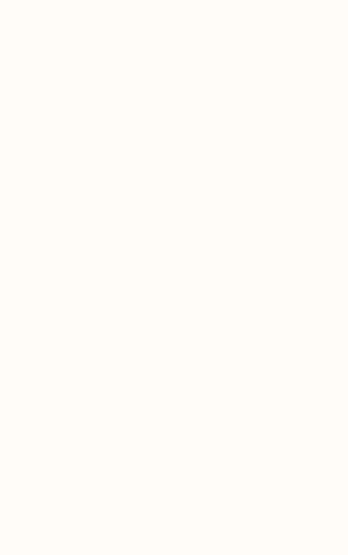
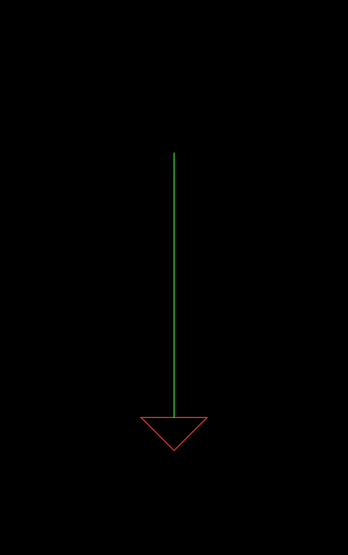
wire: none -> (174, 153) (174, 417)
power symbol: none -> (174, 433)

